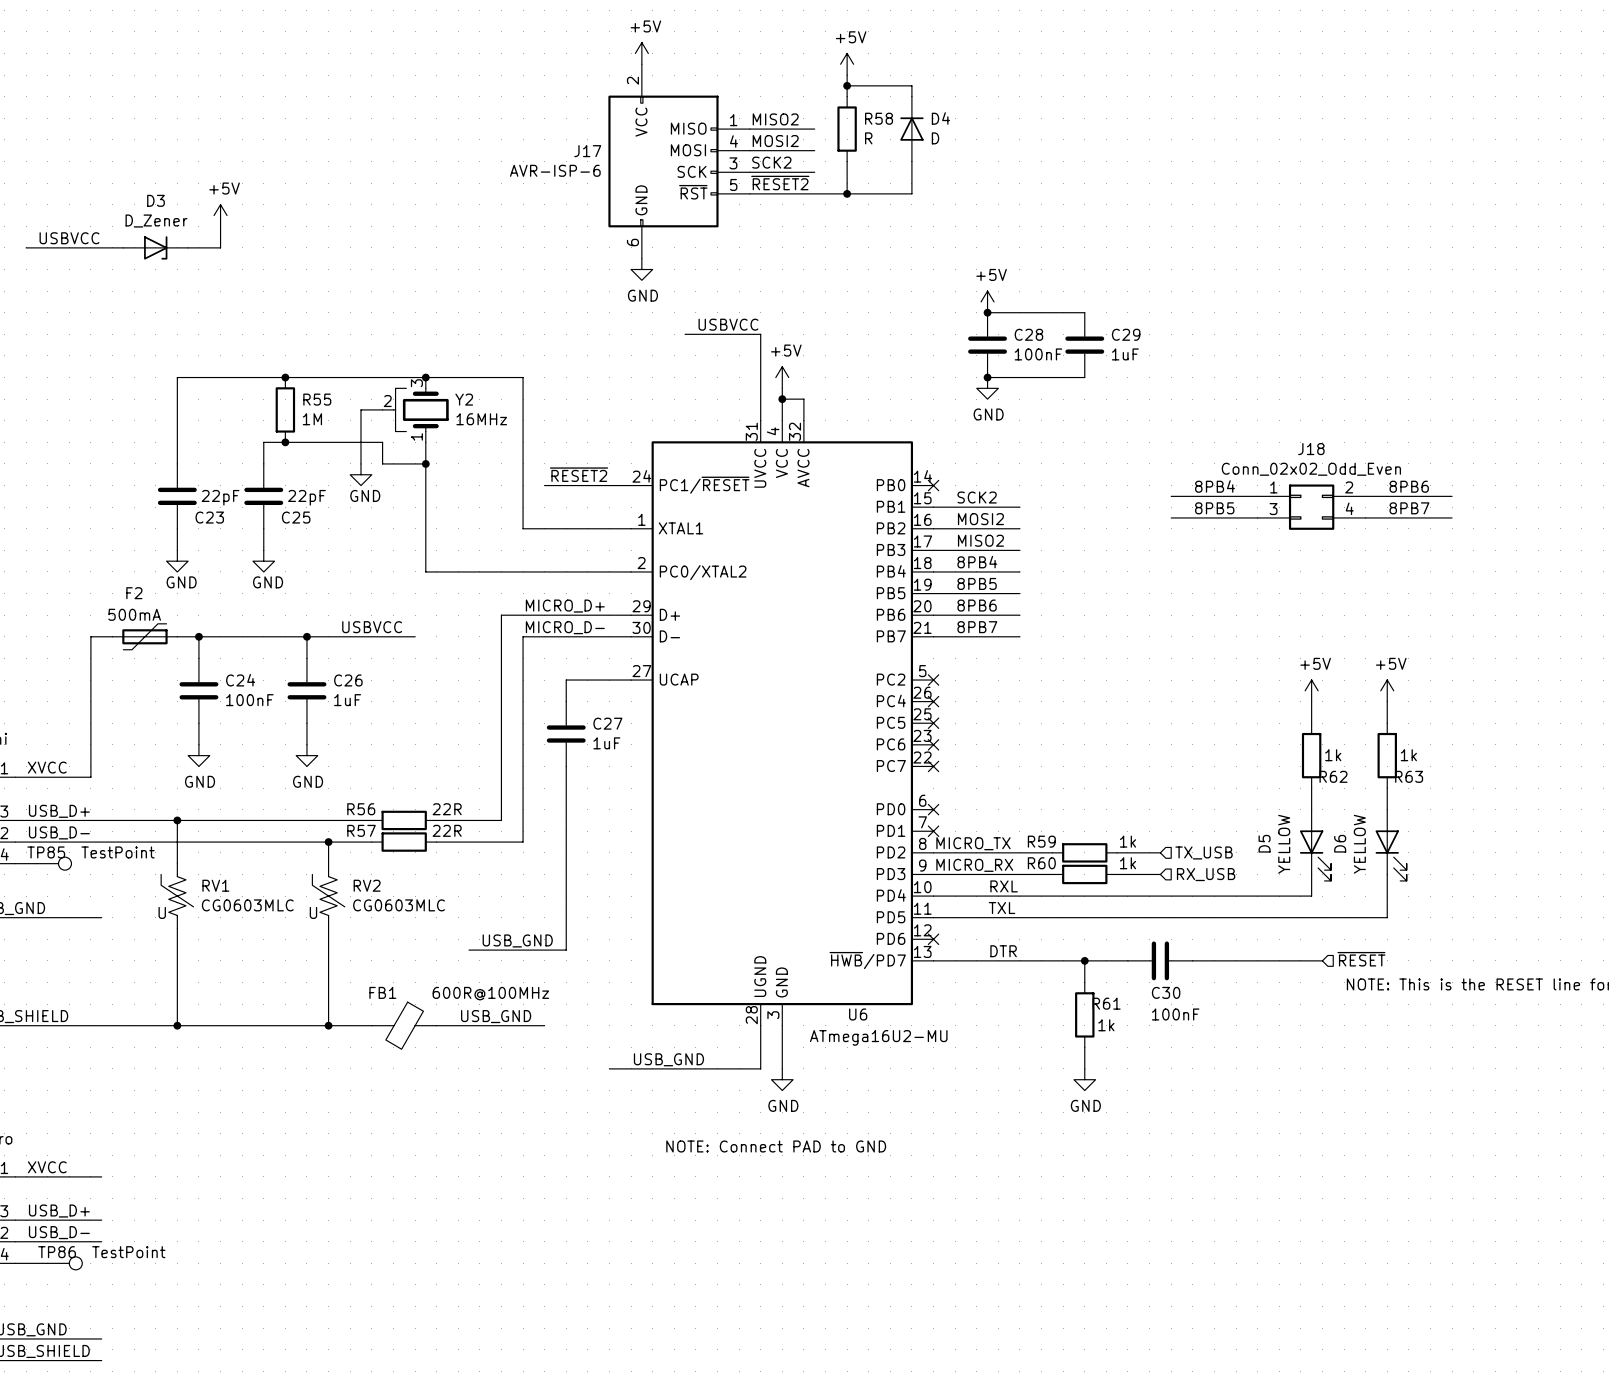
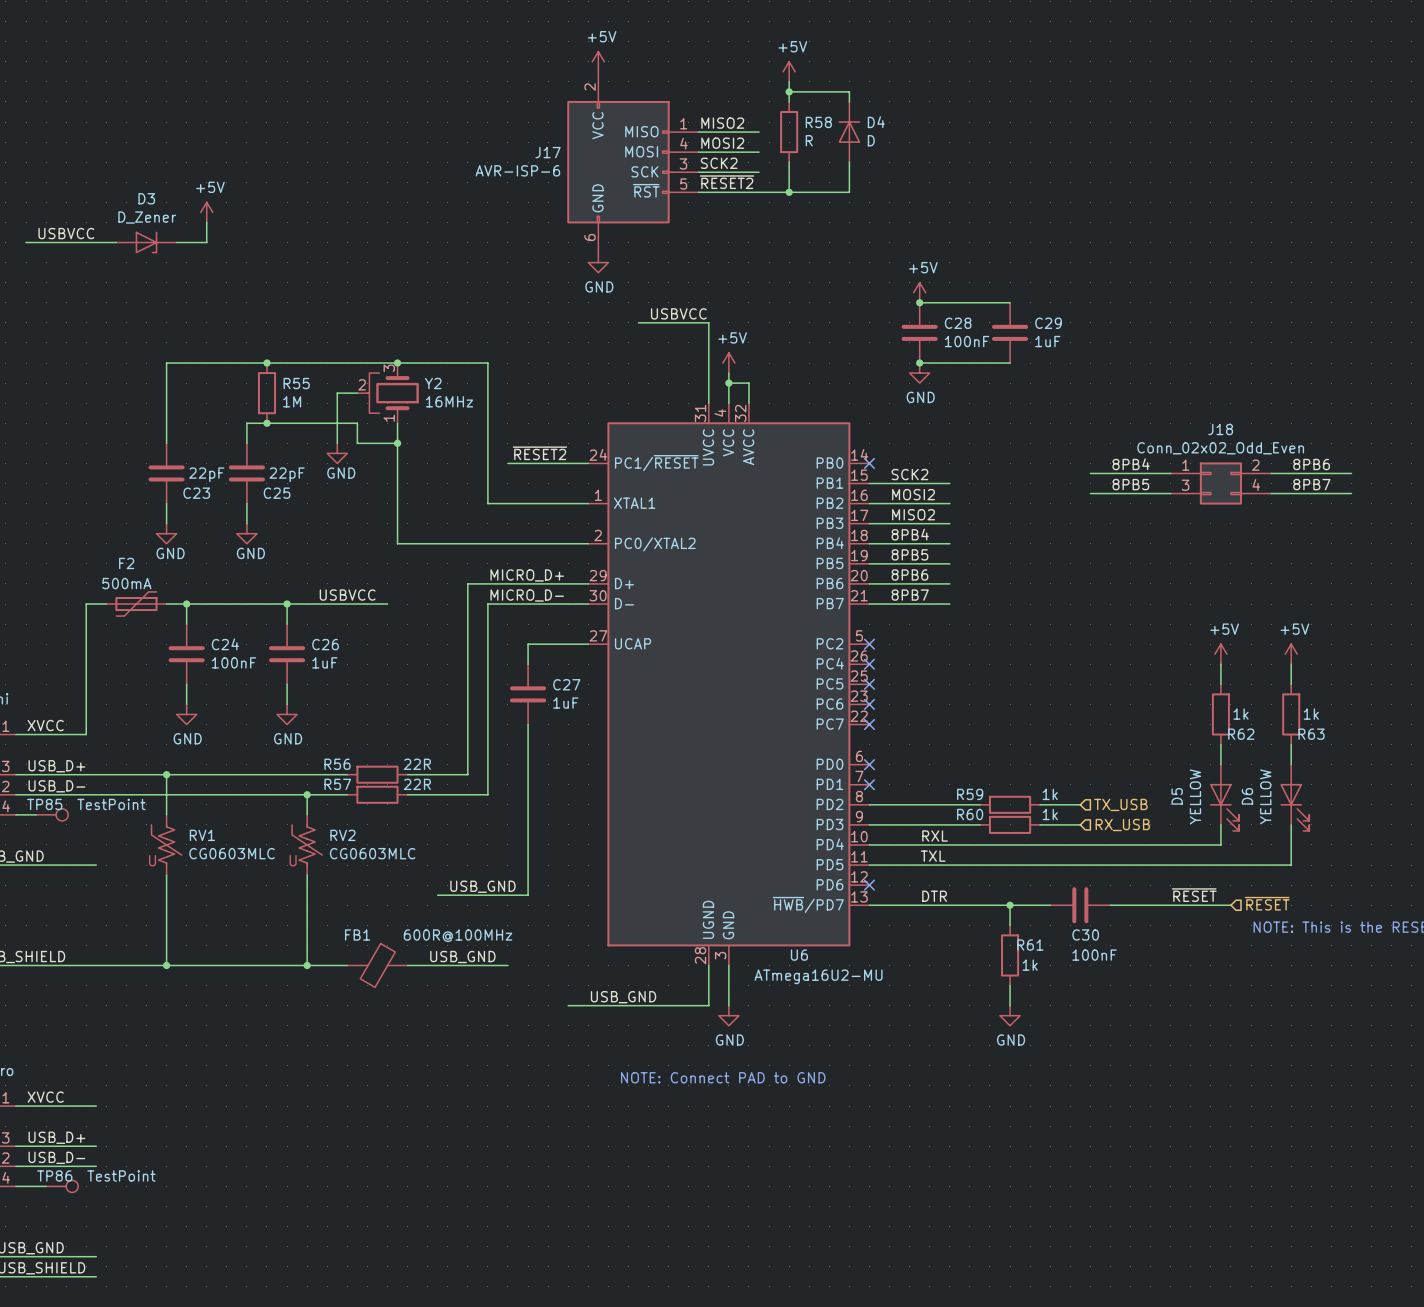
label: MICRO_TX (973, 843) -> none
label: MICRO_RX (974, 865) -> none
label: none -> ~{RESET} (1194, 895)

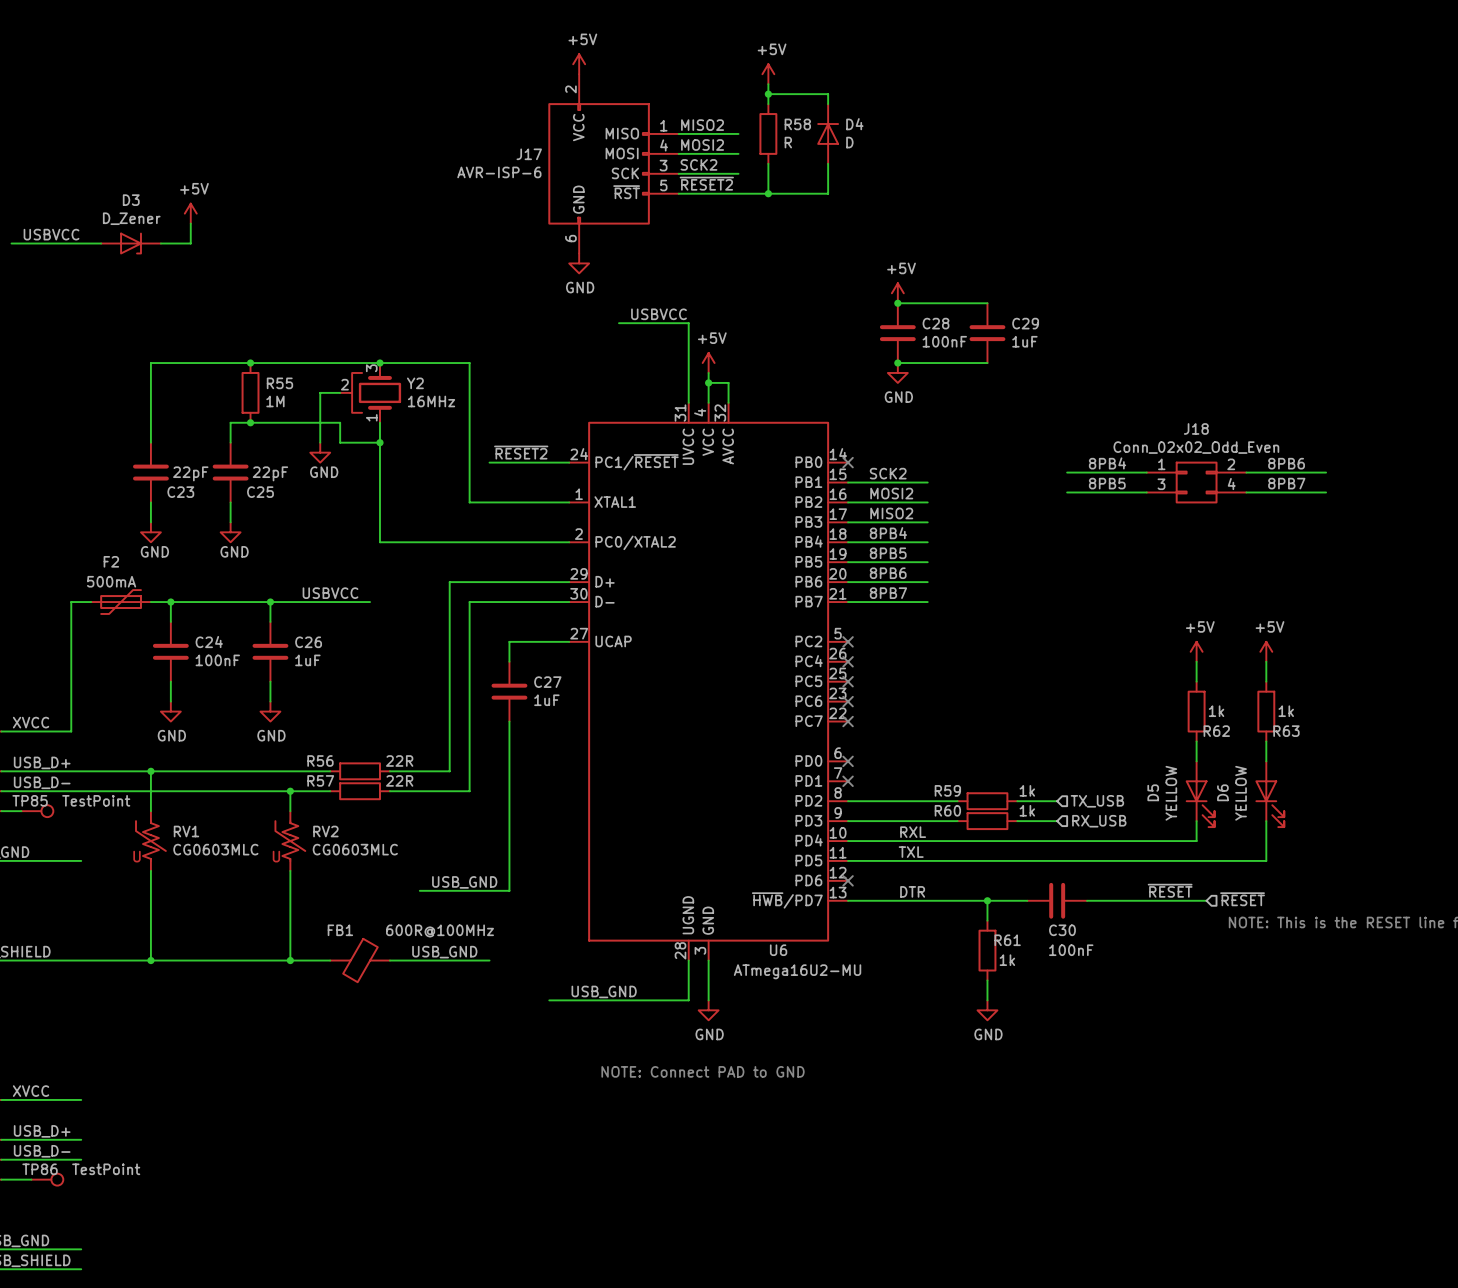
label: MICRO_D+ (527, 575) -> none
label: MICRO_D- (527, 595) -> none

